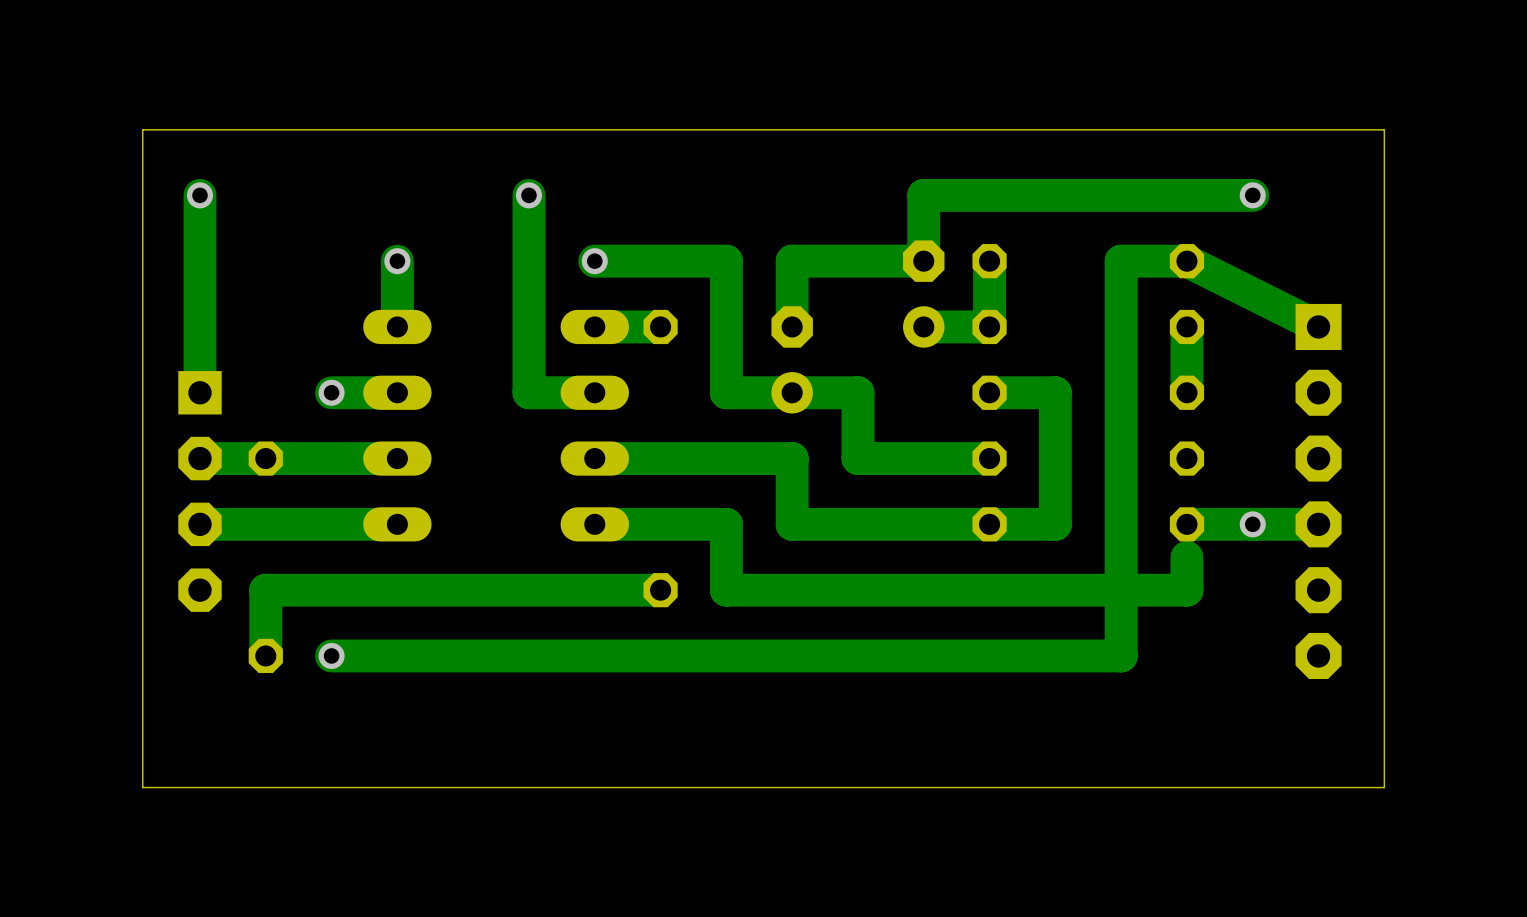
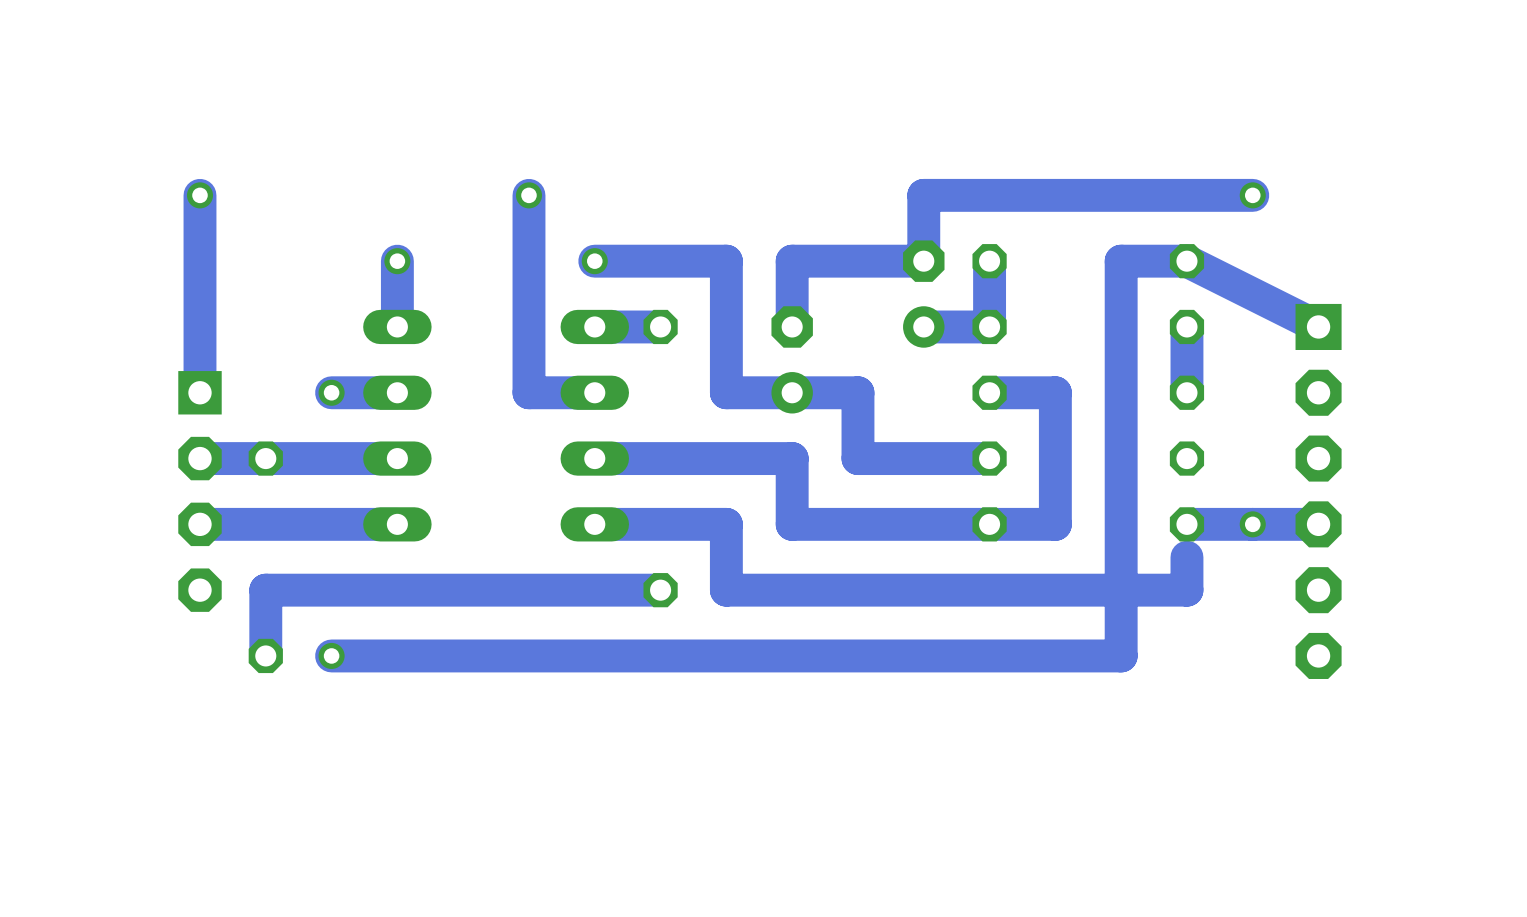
board edge: (1384, 129) (142, 129) (142, 787) (1384, 787) (1384, 129) -> none

